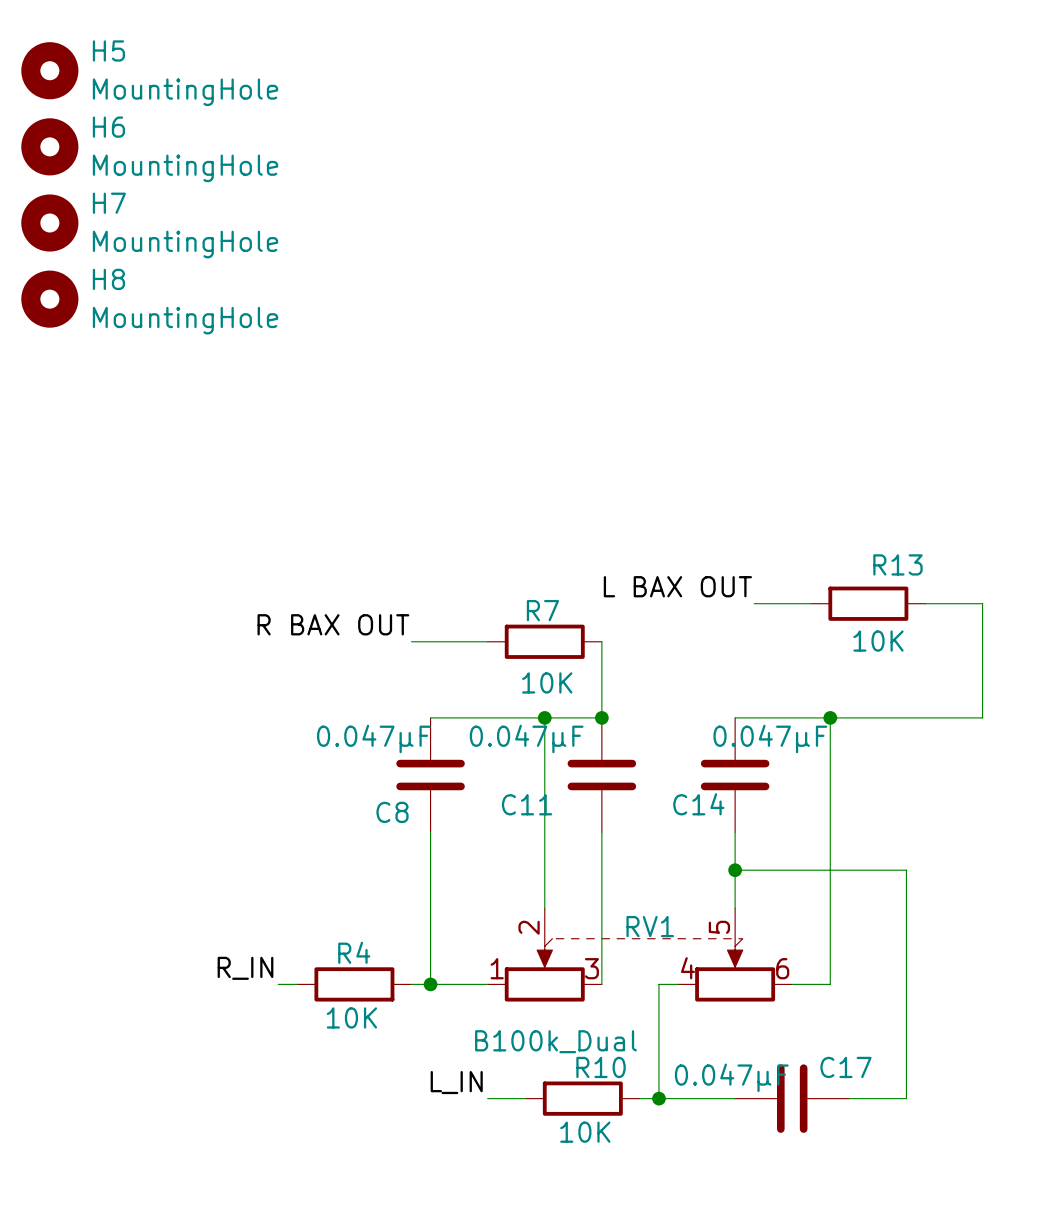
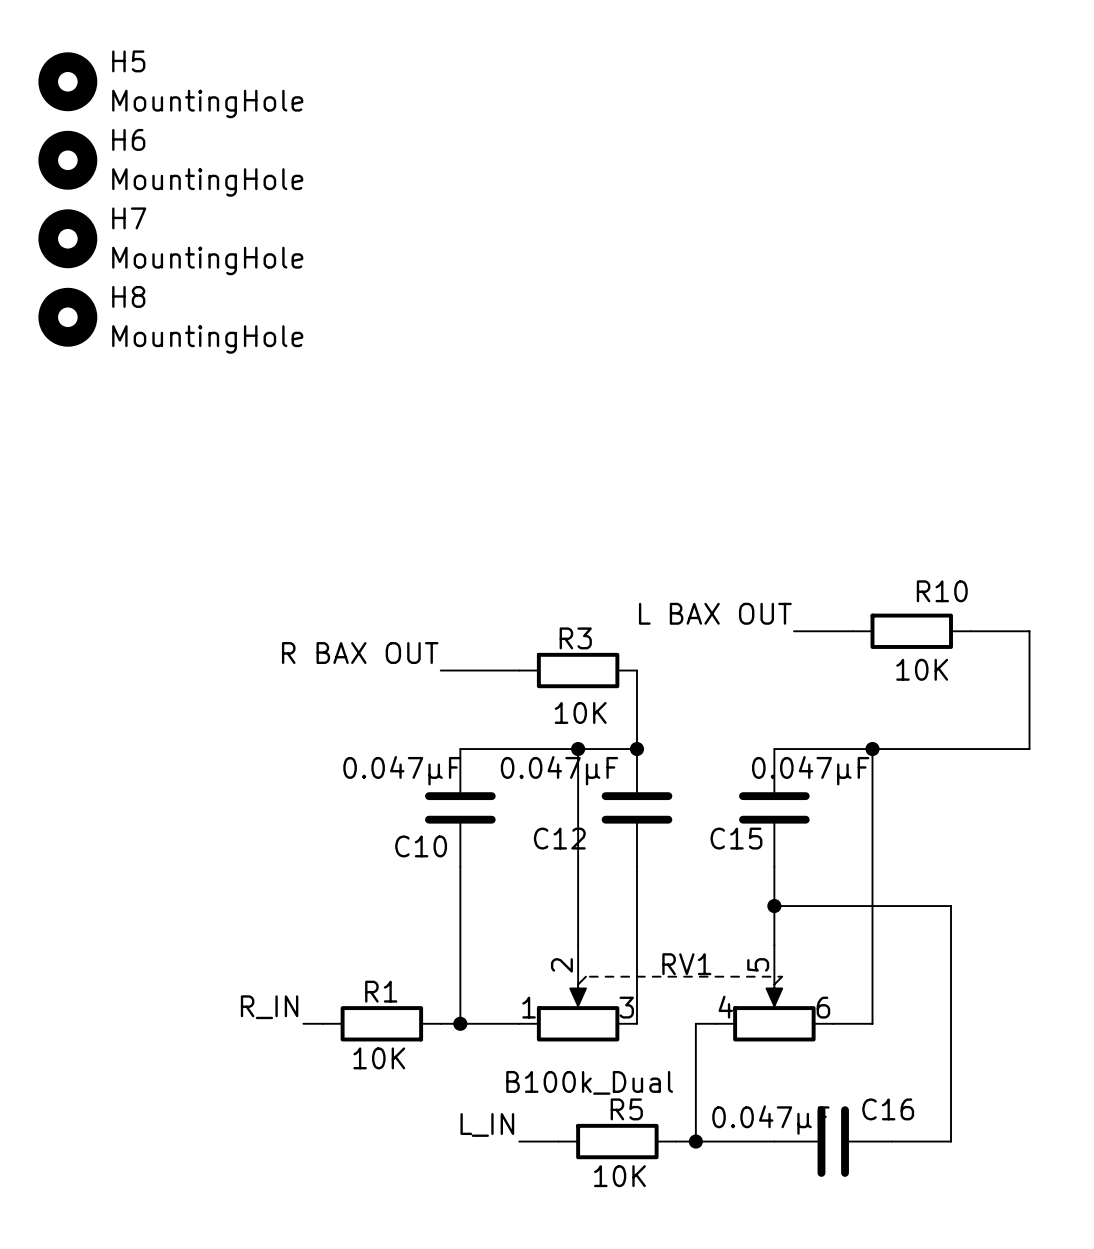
R13 name: R13 (897, 564) -> R10 (942, 591)
R7 name: R7 (542, 610) -> R3 (575, 638)
C11 name: C11 (527, 804) -> C12 (559, 838)
C14 name: C14 (698, 804) -> C15 (736, 838)
C8 name: C8 (392, 812) -> C10 (421, 846)
R4 name: R4 (354, 952) -> R1 (381, 991)
R10 name: R10 (601, 1067) -> R5 (626, 1109)
C17 name: C17 (845, 1067) -> C16 (888, 1109)

